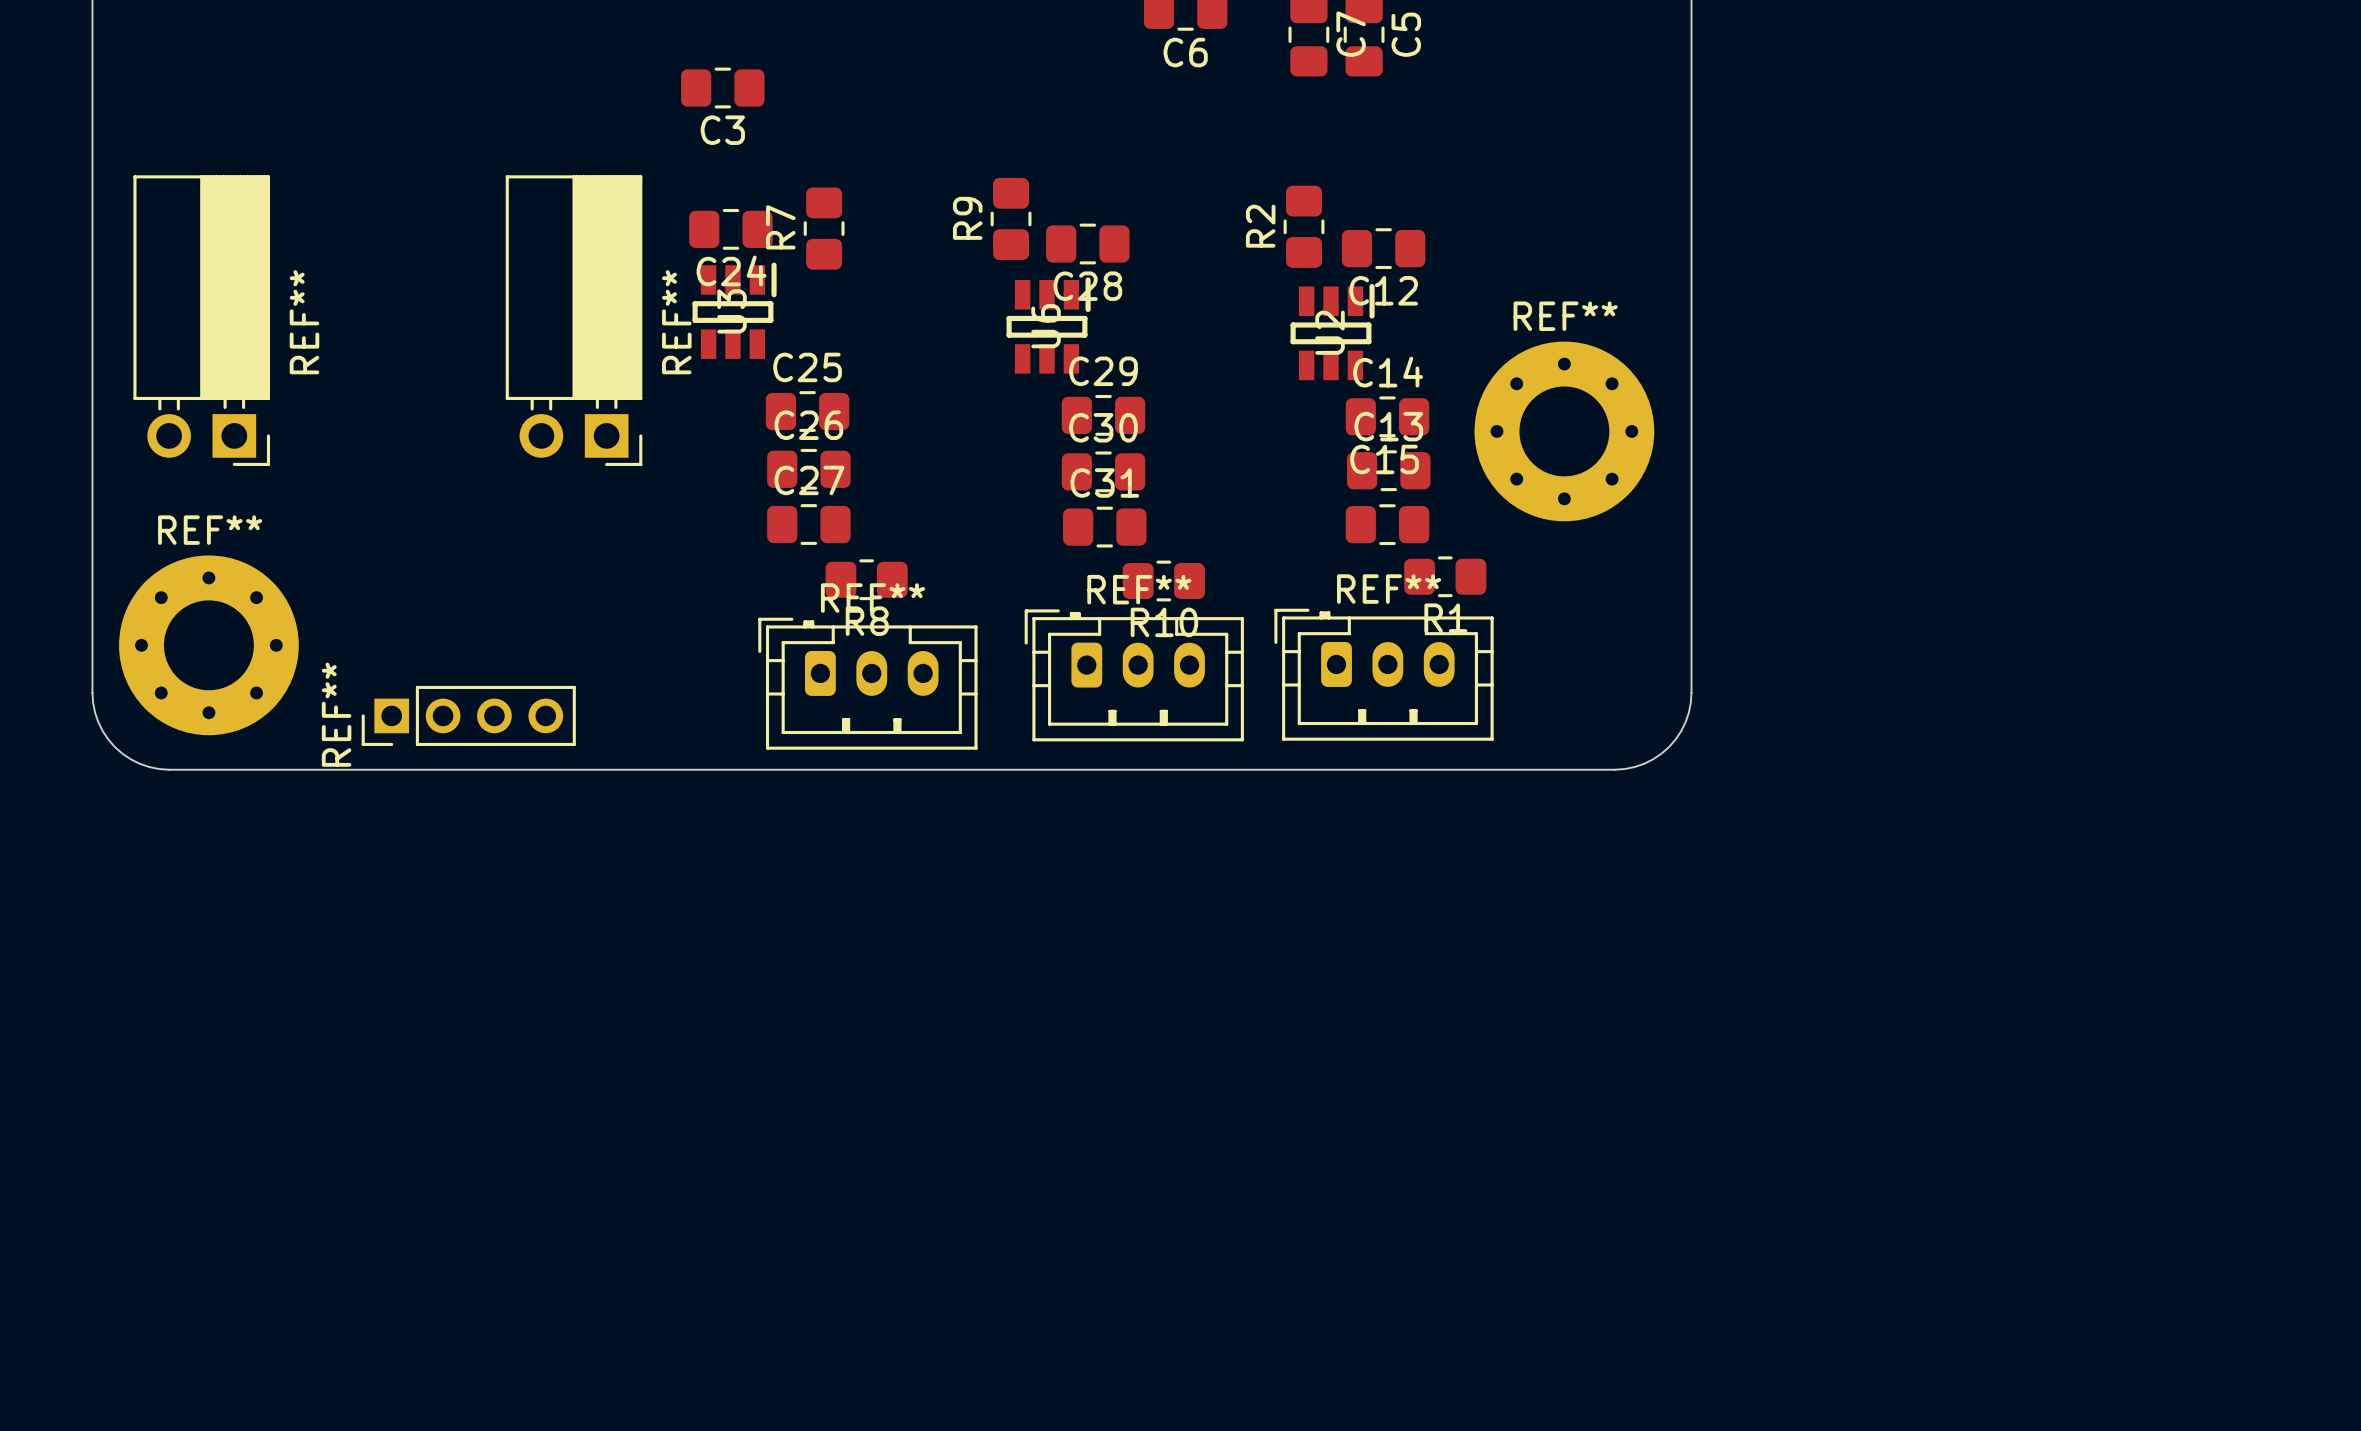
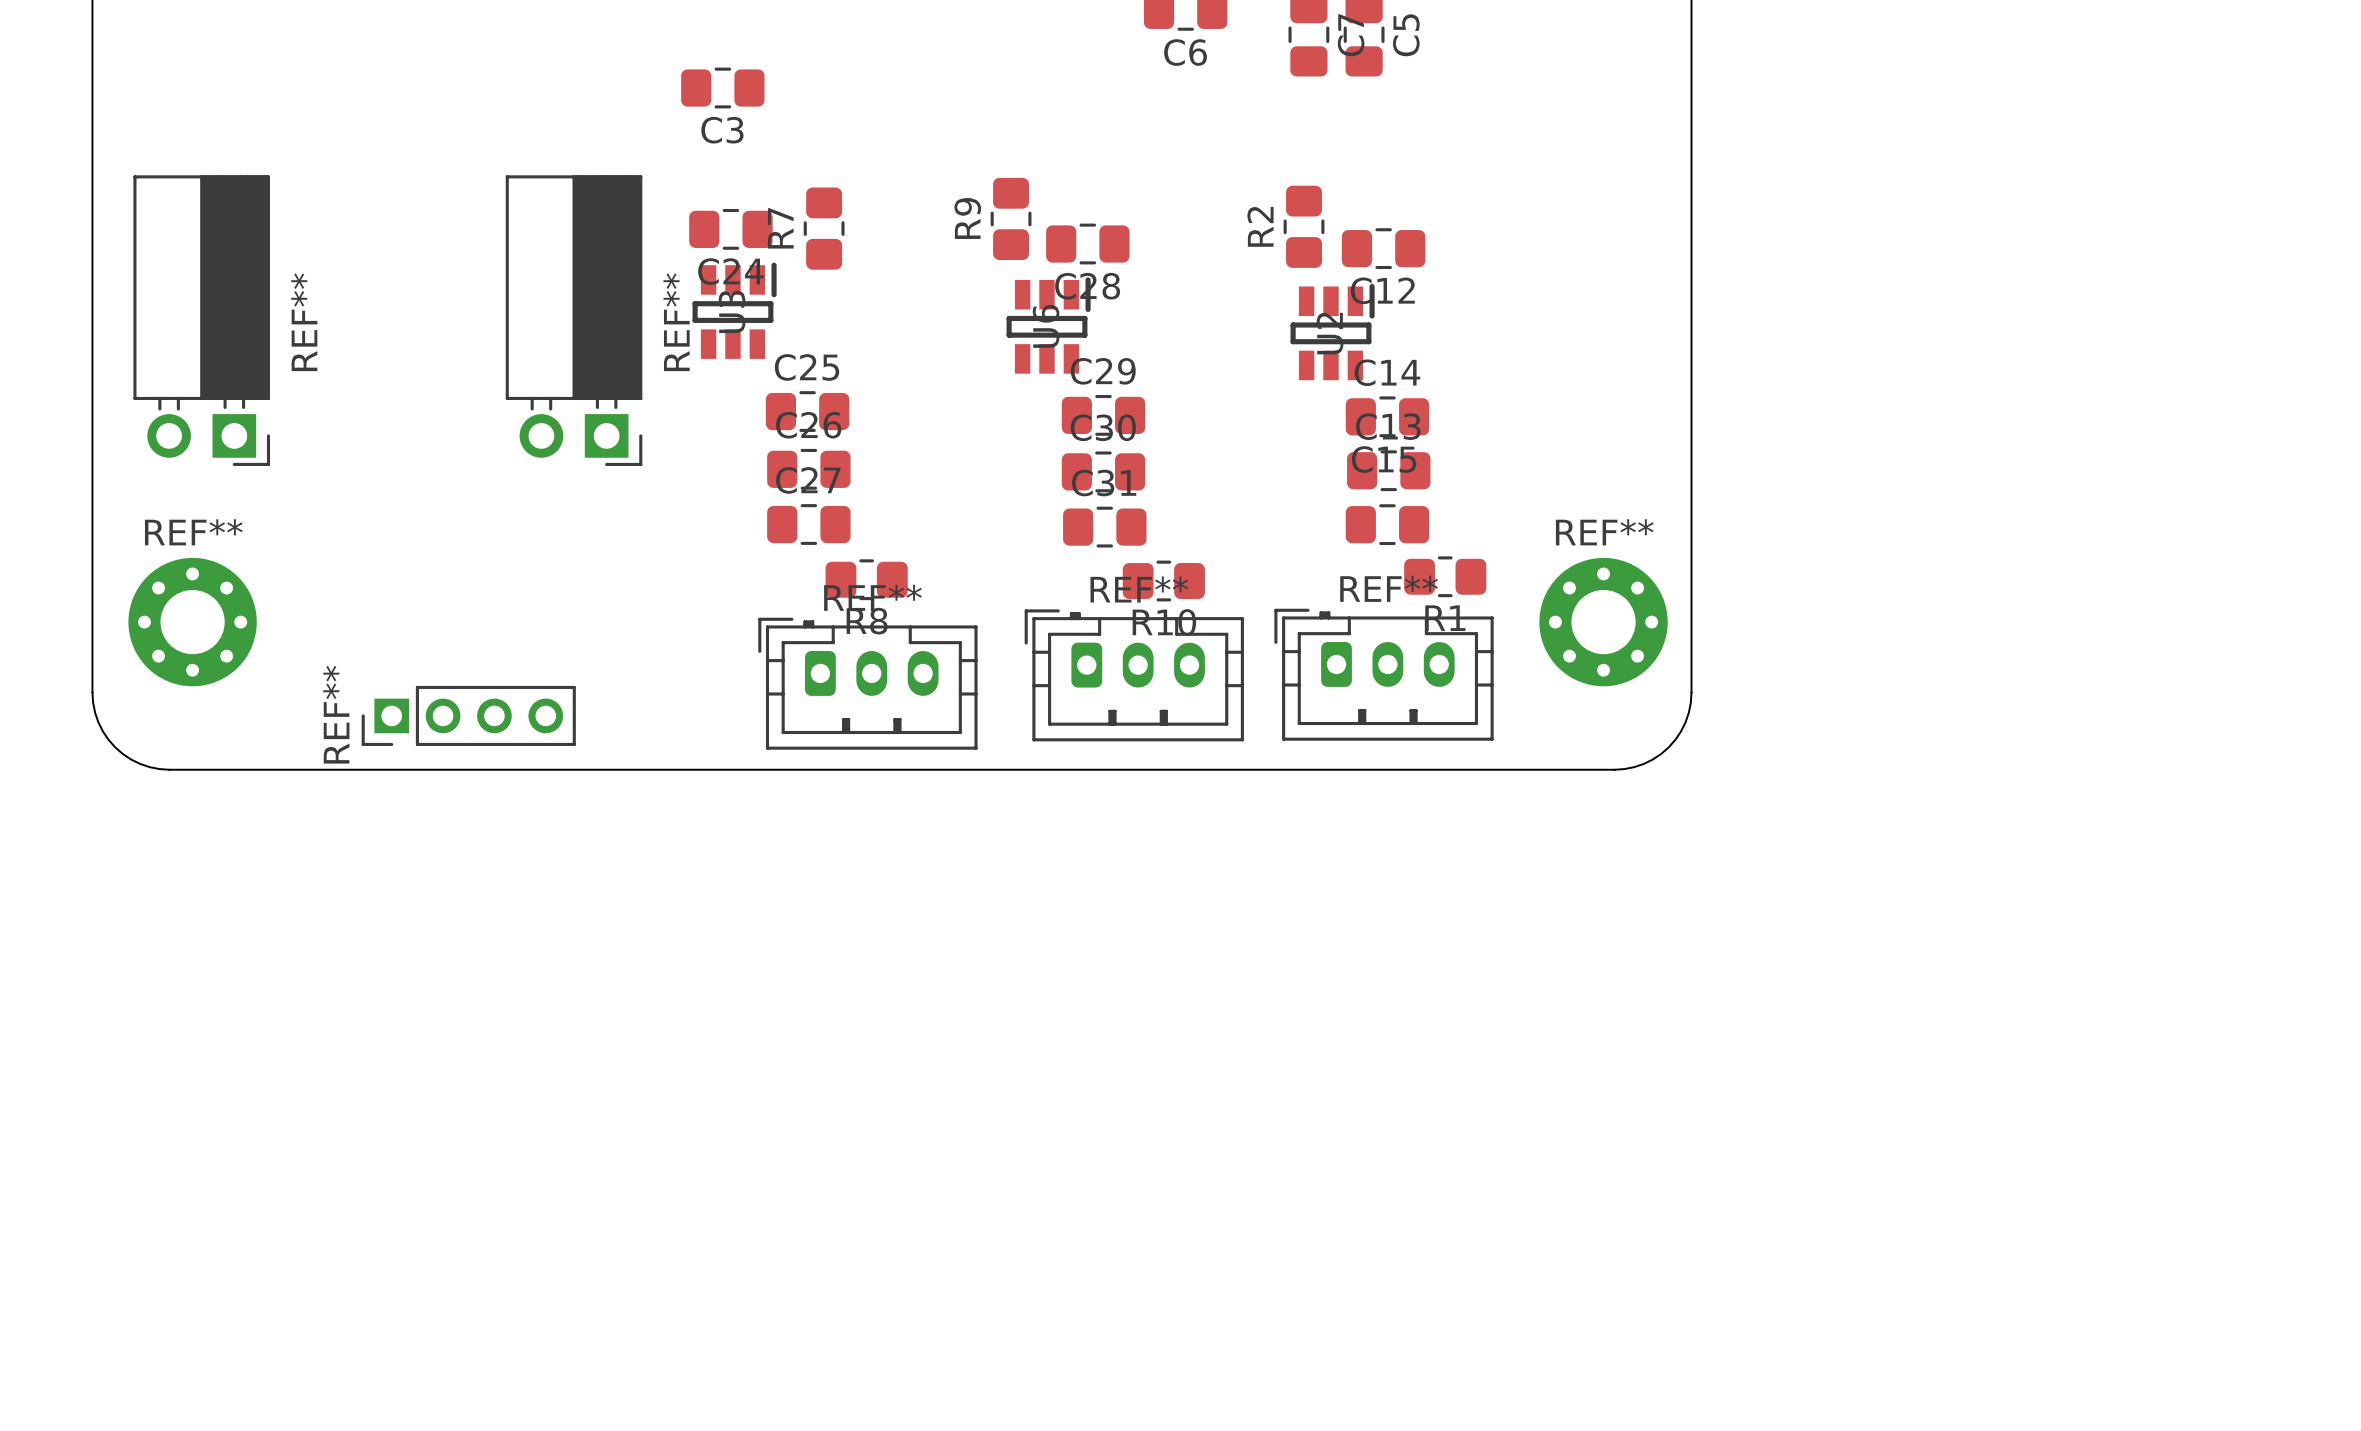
REF**: (1564, 431) -> none
REF**: none -> (192, 622)
REF**: none -> (1603, 622)
REF**: (208, 645) -> none

